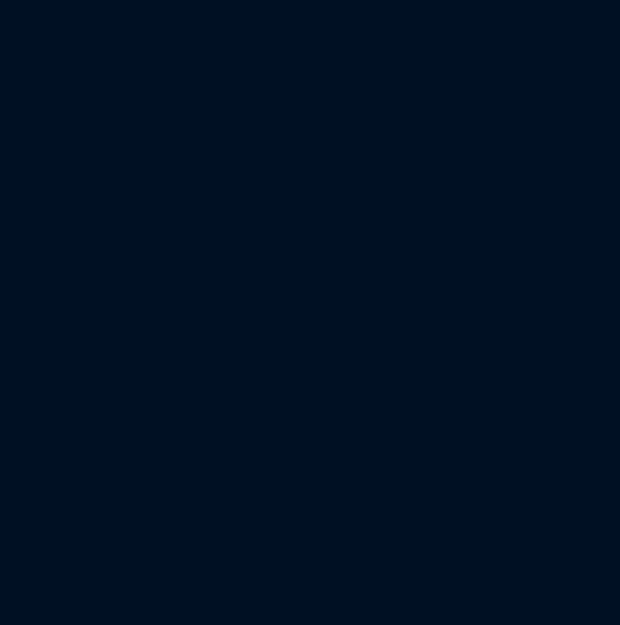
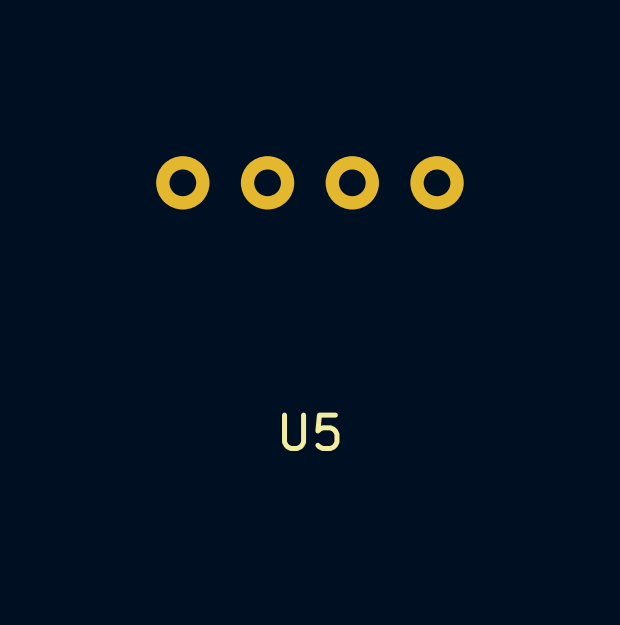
U5: none -> (309, 182)

